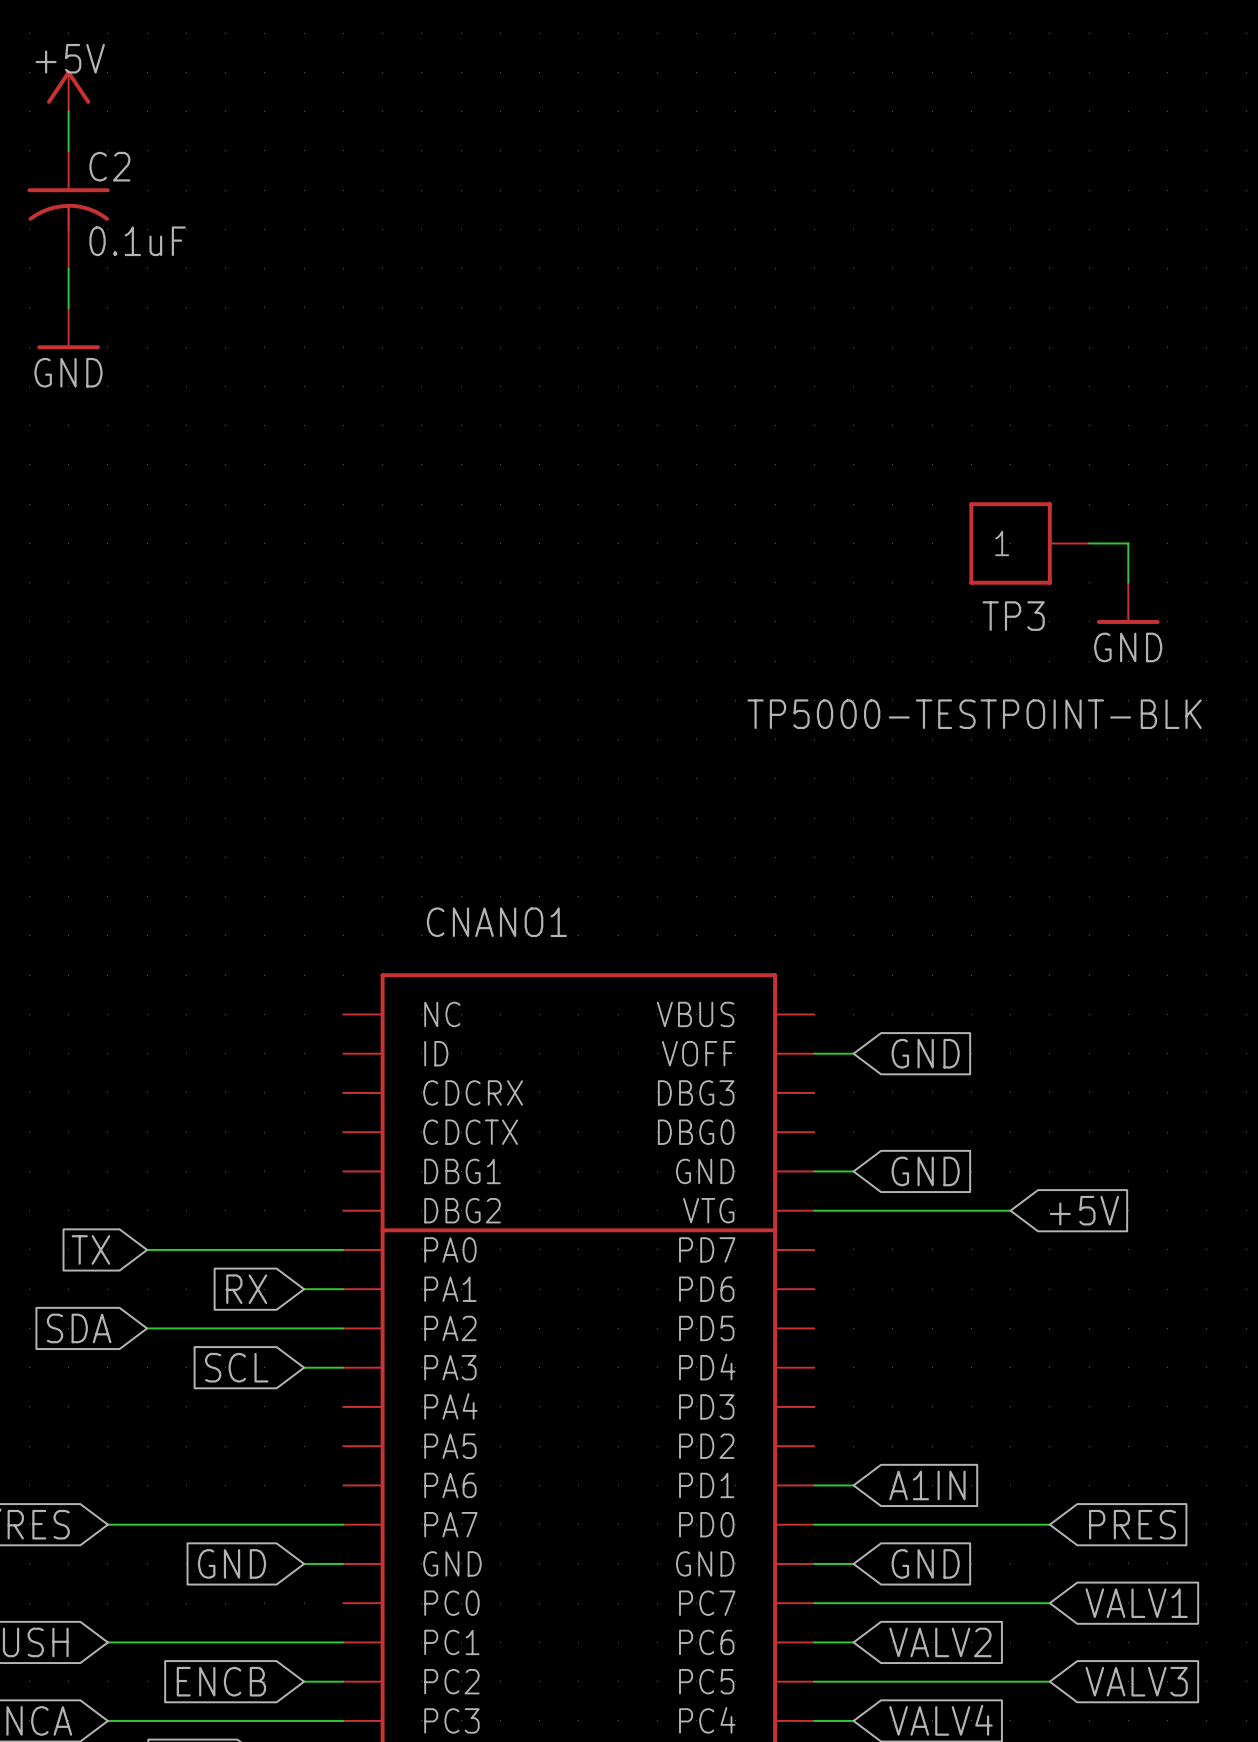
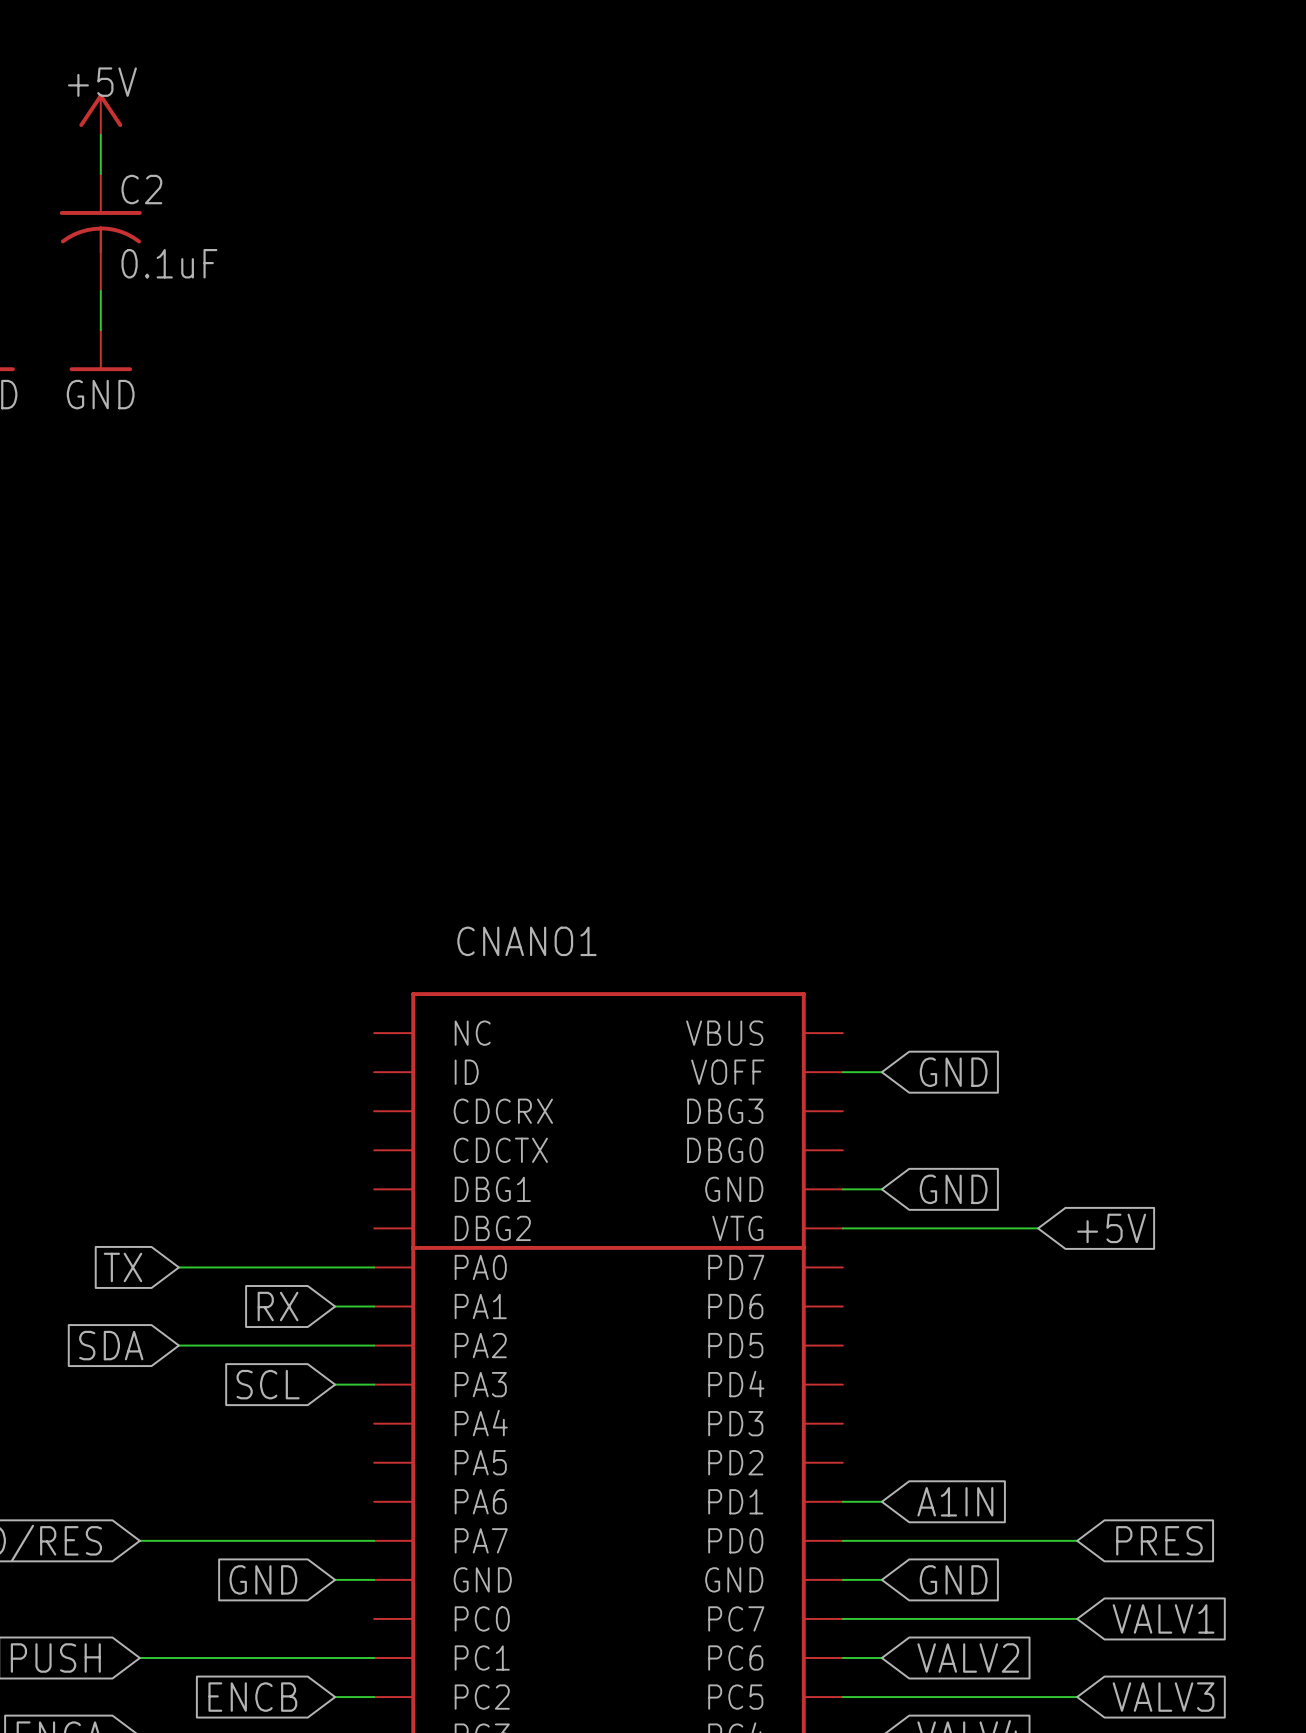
TP3: TP5000-TESTPOINT-BLK (1029, 543) -> none
wire: (1089, 543) (1128, 543) (1128, 582) -> none
power symbol: GND (1128, 603) -> none

